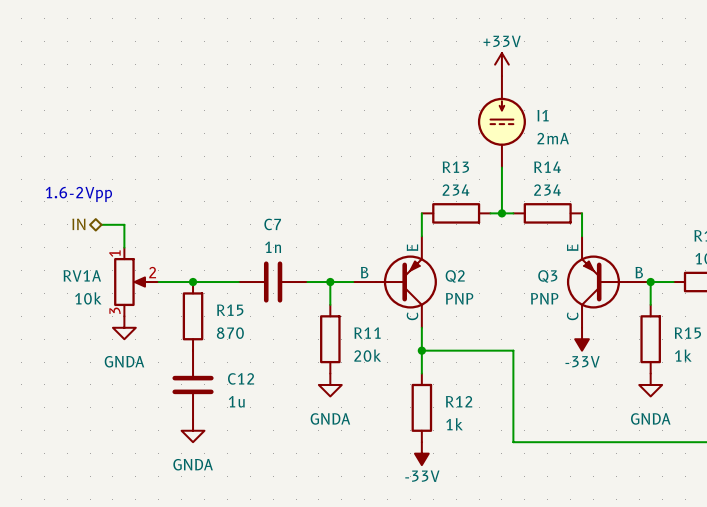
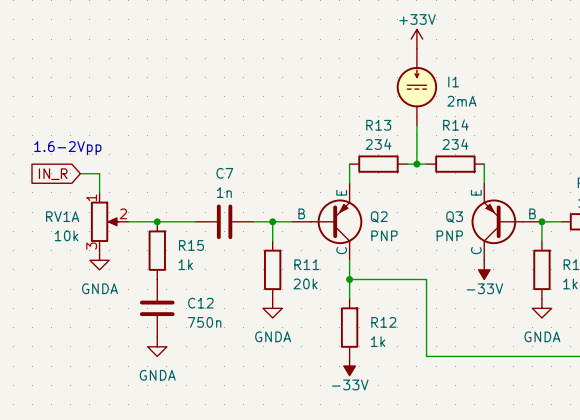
hierarchical label: IN (78, 224) -> none
global label: none -> IN_R (53, 174)
R15 value: 870 (230, 333) -> 1k (185, 264)
C12 value: 1u (236, 401) -> 750n (204, 322)

